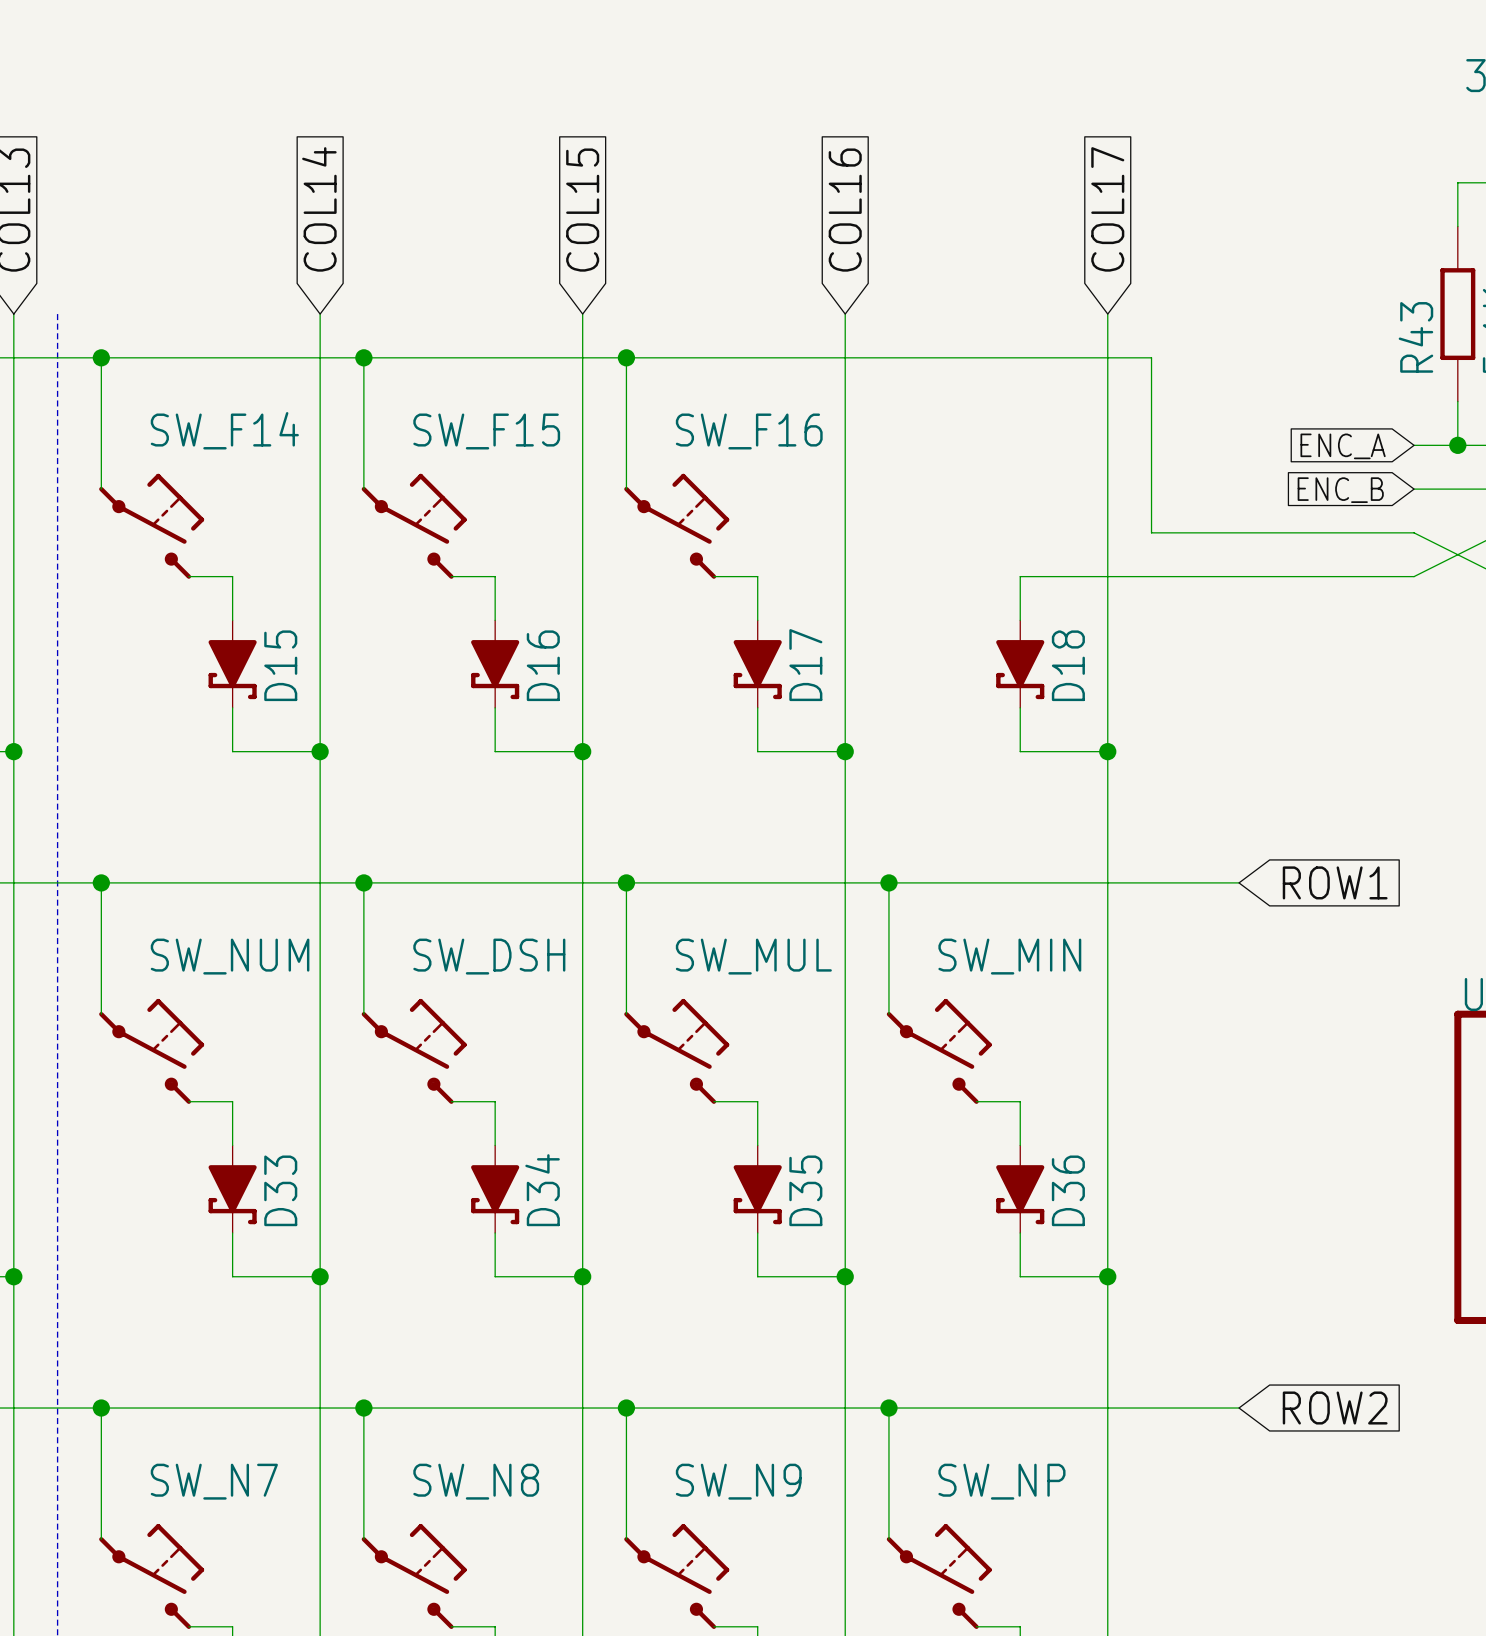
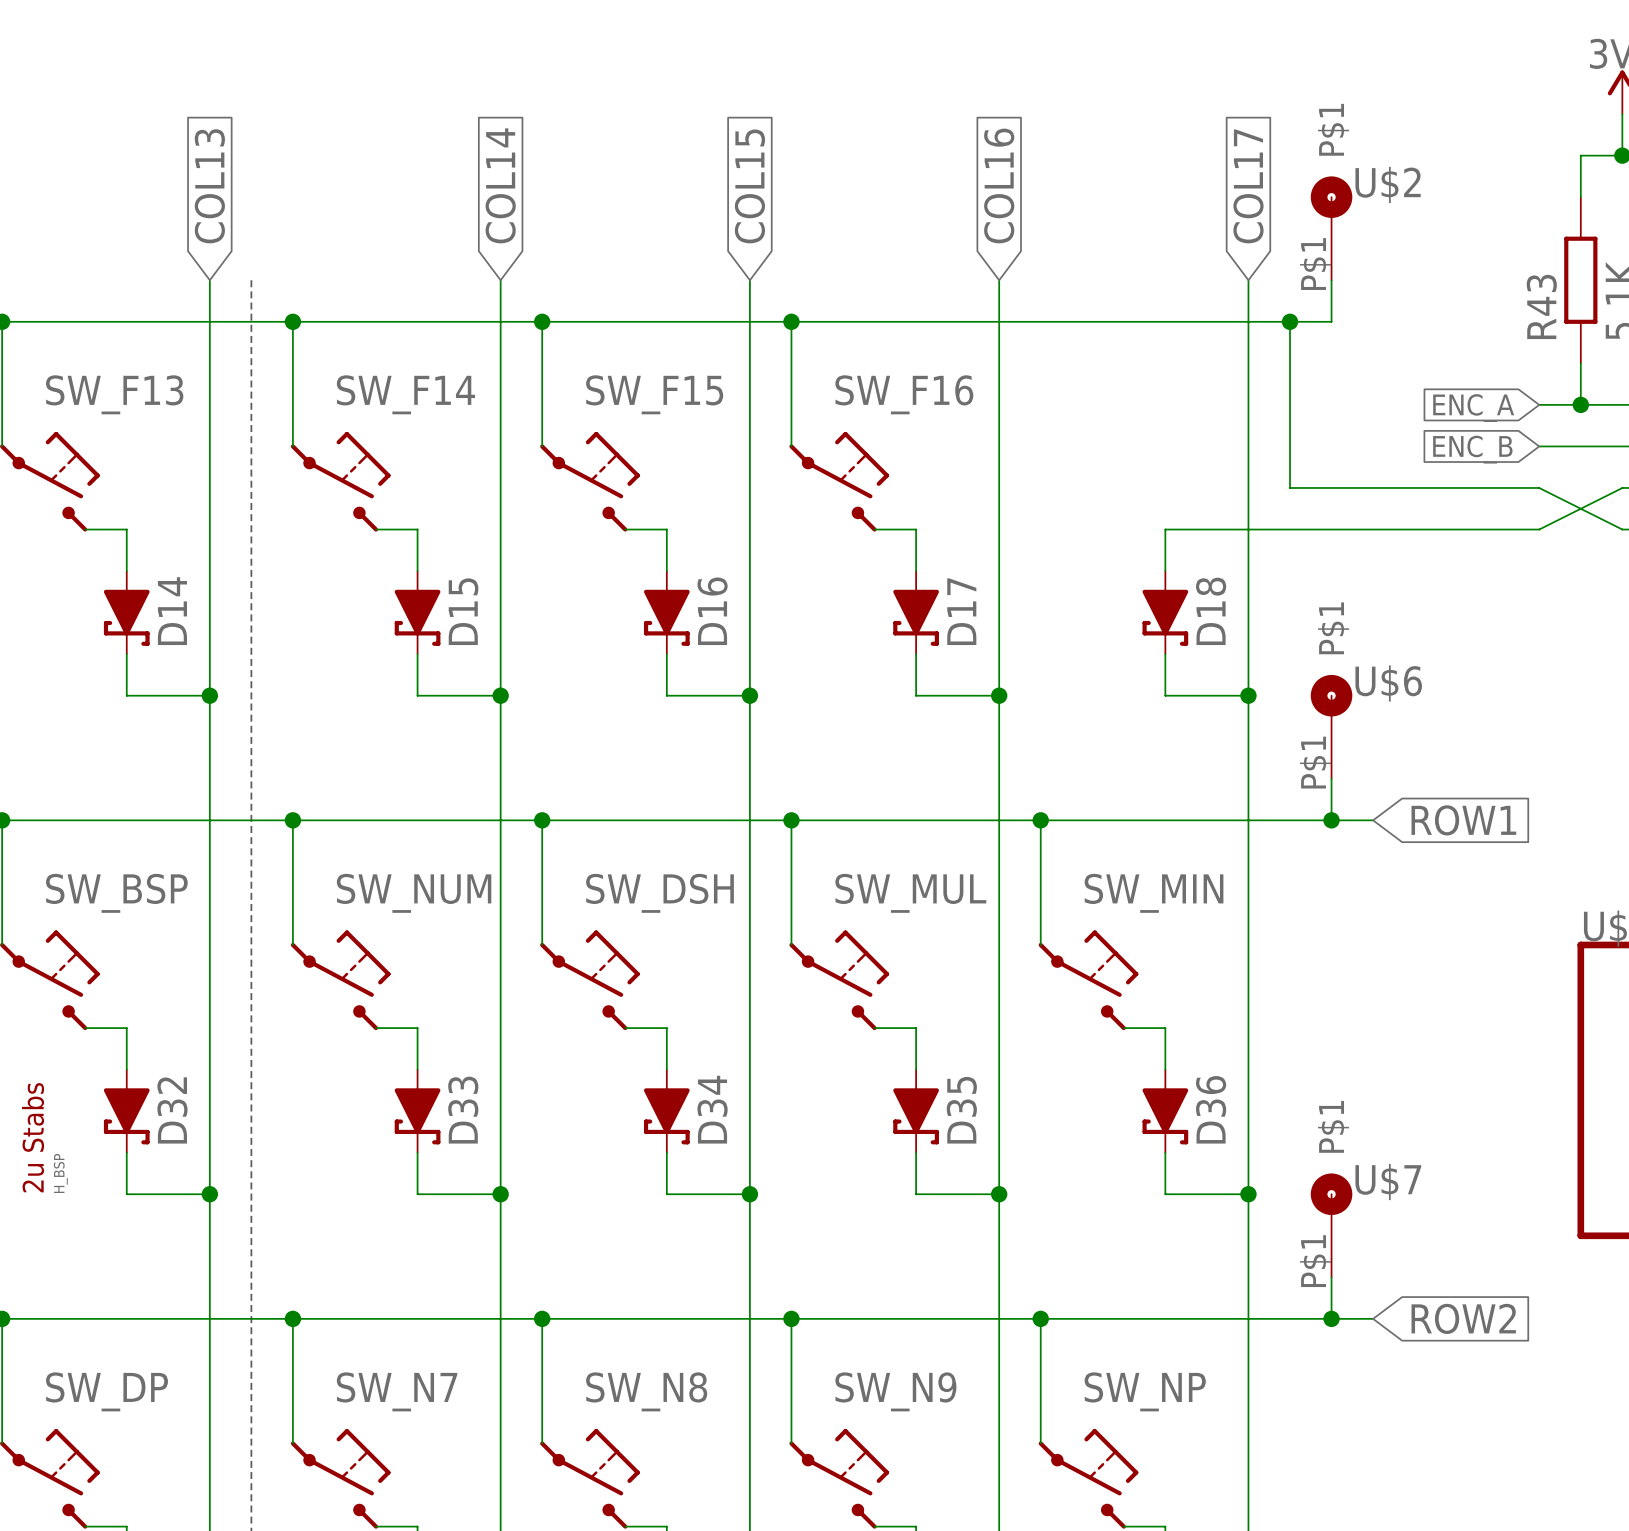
U$2: none -> (1331, 228)
wire: none -> (1331, 280) (1331, 321) (1290, 321)
junction: none -> (1290, 321)
U$6: none -> (1331, 726)
wire: none -> (1331, 778) (1331, 820)
junction: none -> (1331, 820)
U$7: none -> (1331, 1225)
wire: none -> (1331, 1277) (1331, 1318)
junction: none -> (1331, 1318)

